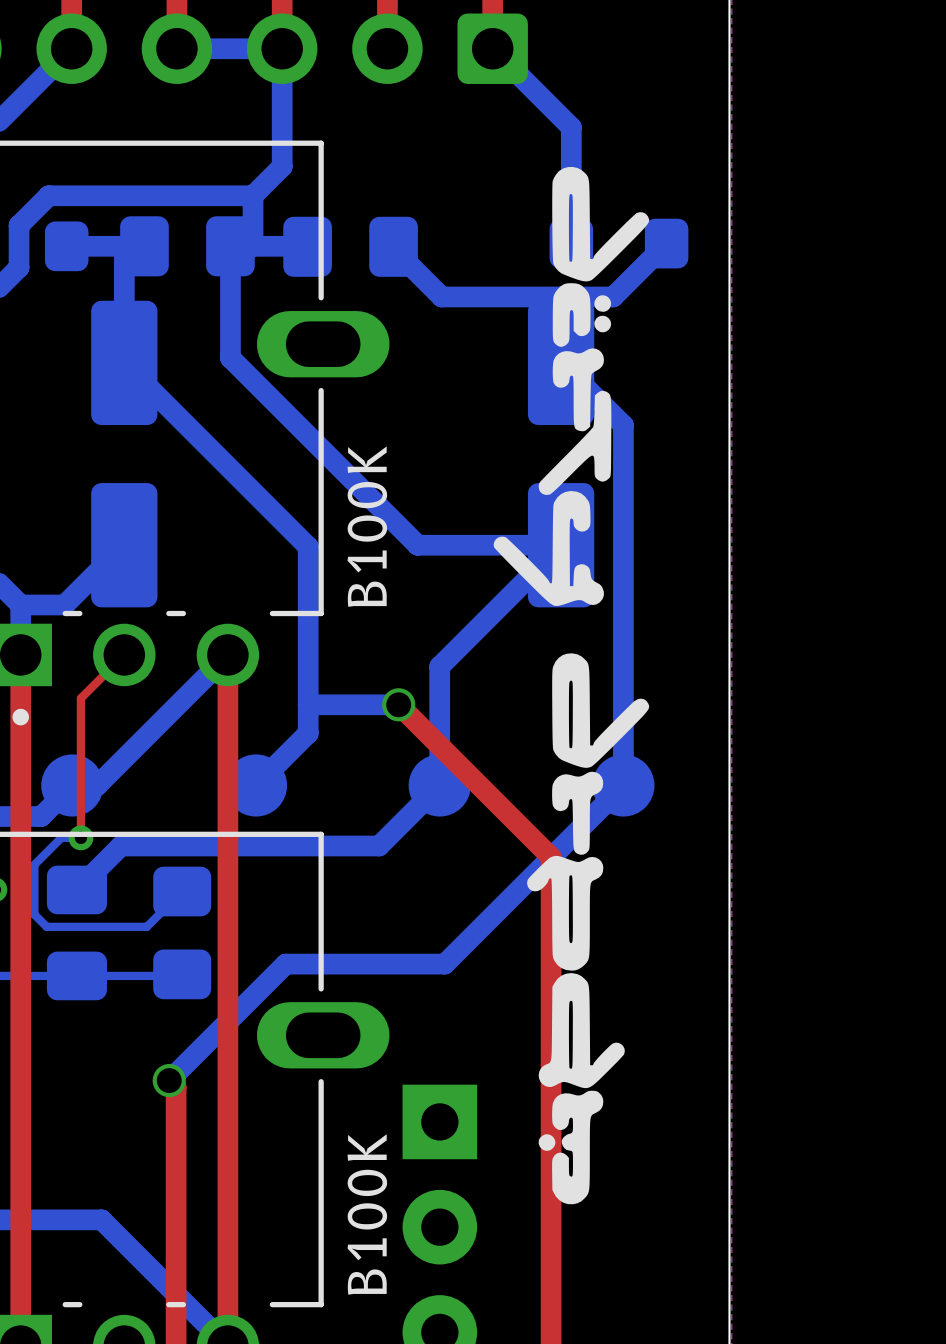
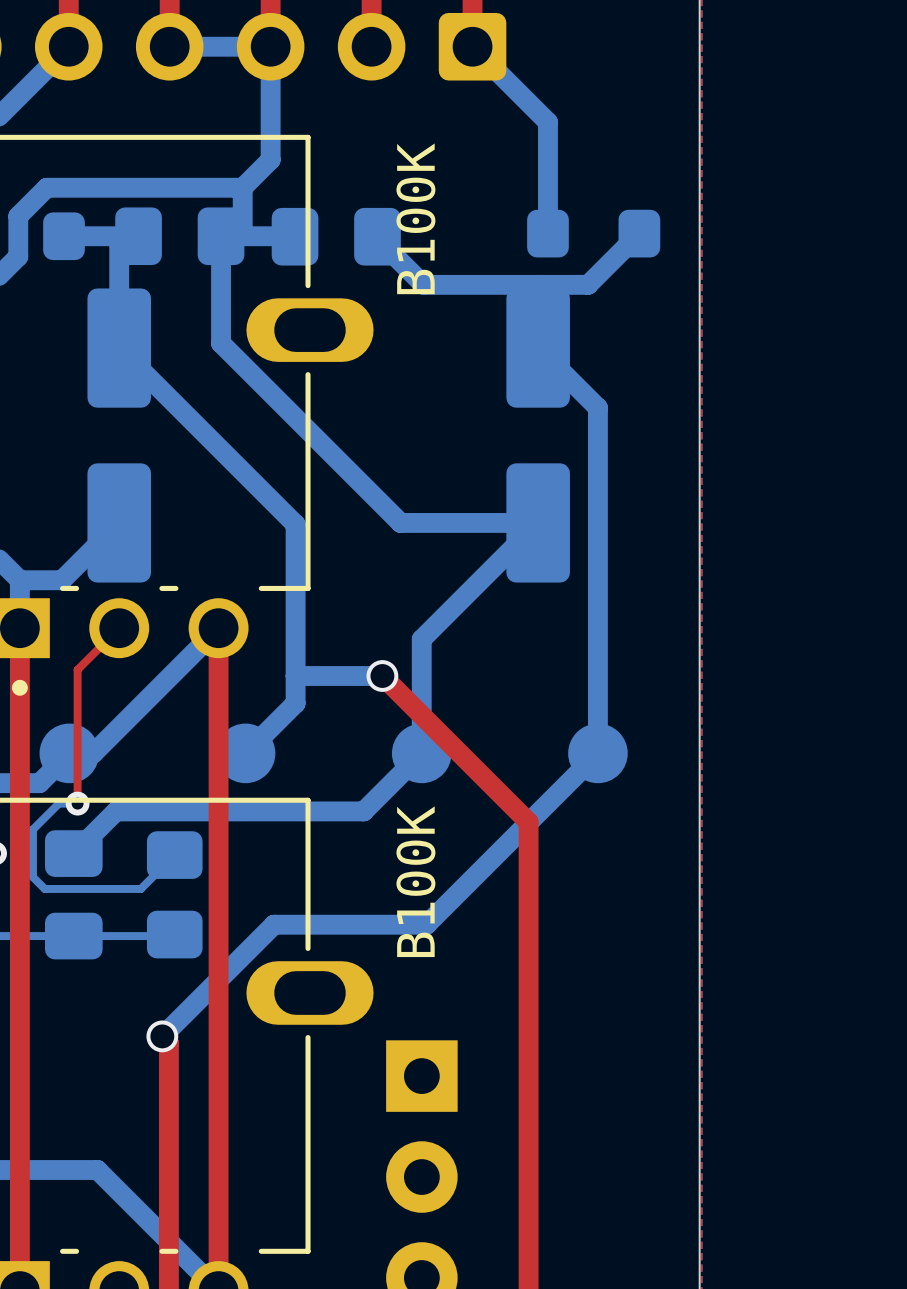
drawing: [493, 166, 650, 1205] -> none
part value position: B100K (367, 526) -> B100K (415, 218)
part value position: B100K (367, 1214) -> B100K (415, 881)

